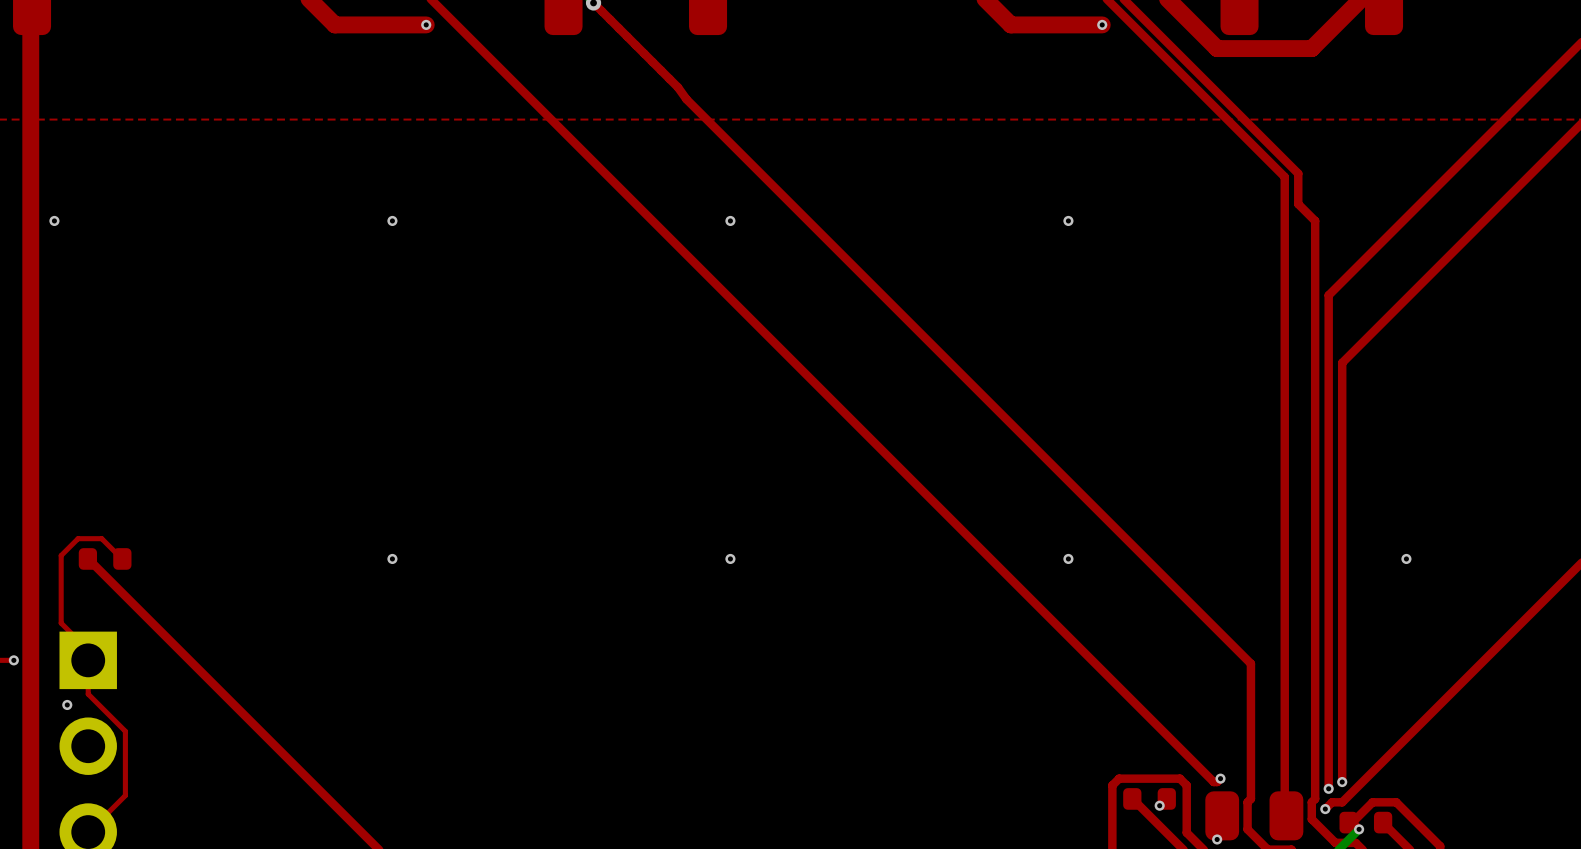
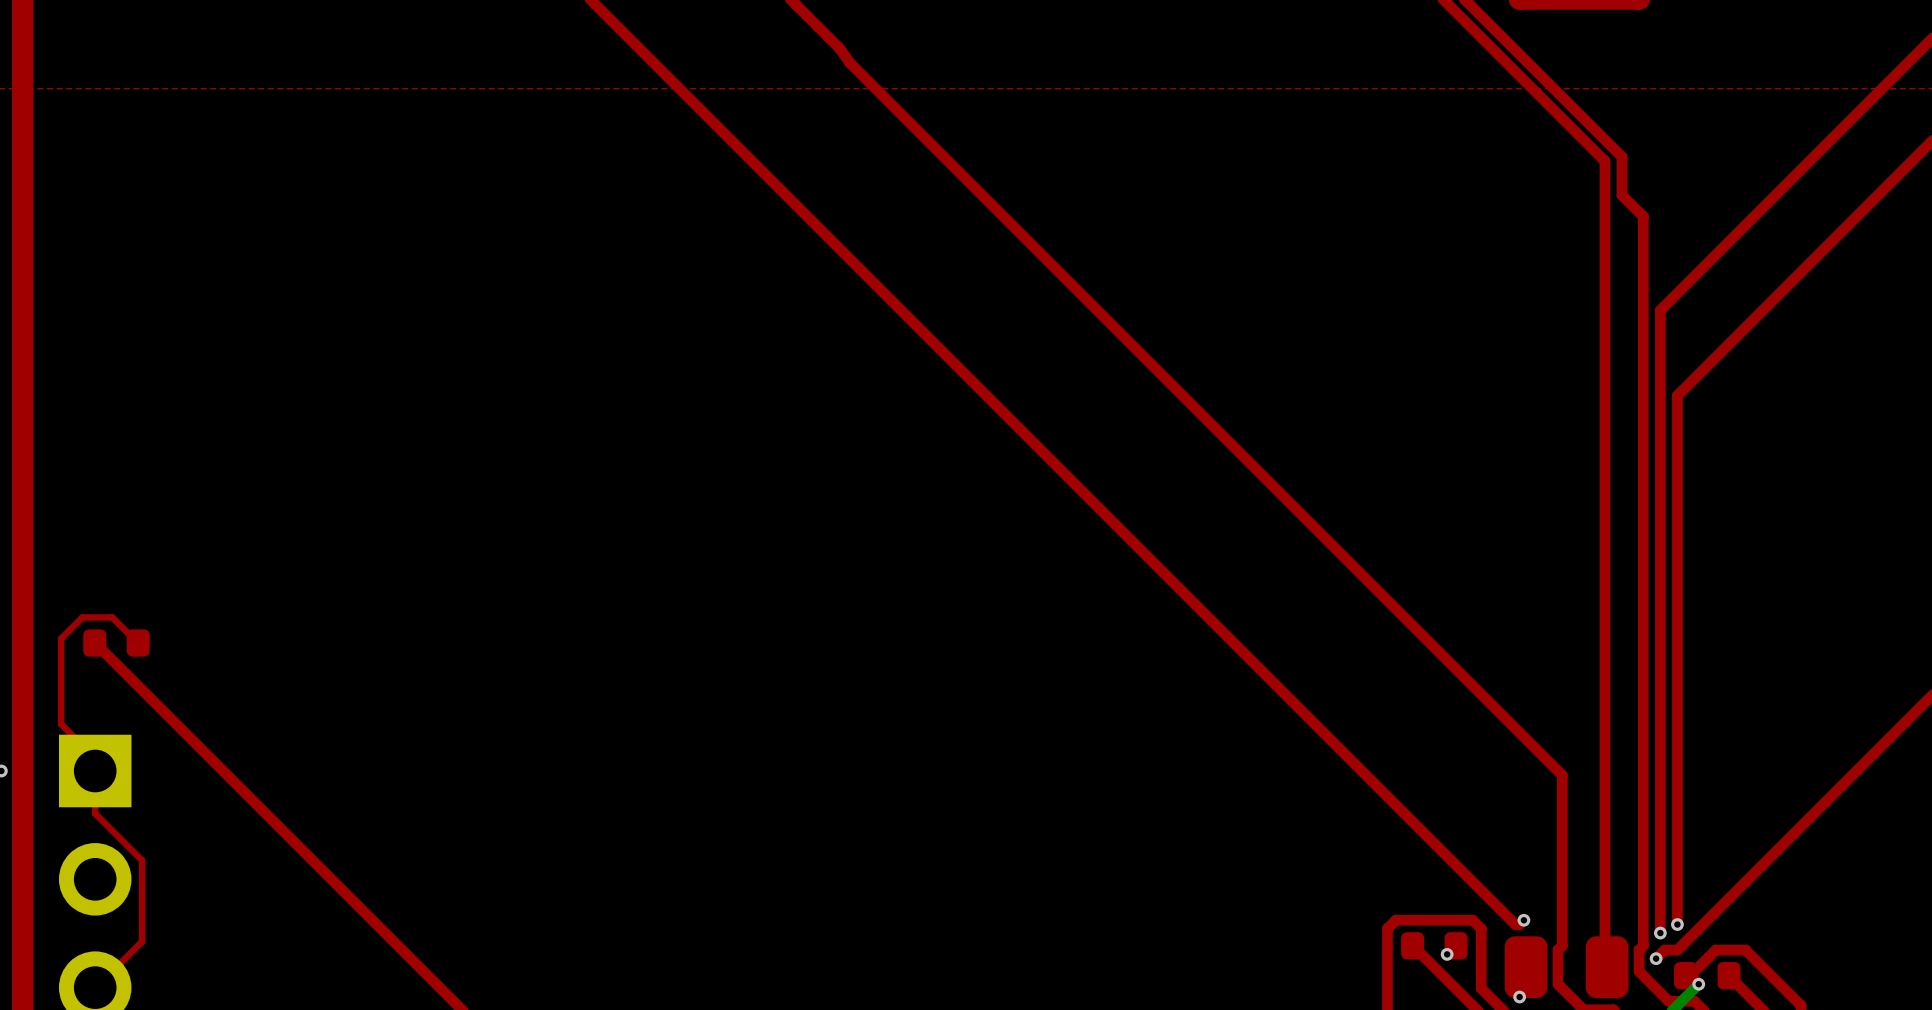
via: (54, 220) -> none
via: (392, 220) -> none
via: (730, 220) -> none
via: (1068, 220) -> none
via: (392, 558) -> none
via: (730, 558) -> none
via: (1068, 558) -> none
via: (1406, 558) -> none
via: (67, 704) -> none

